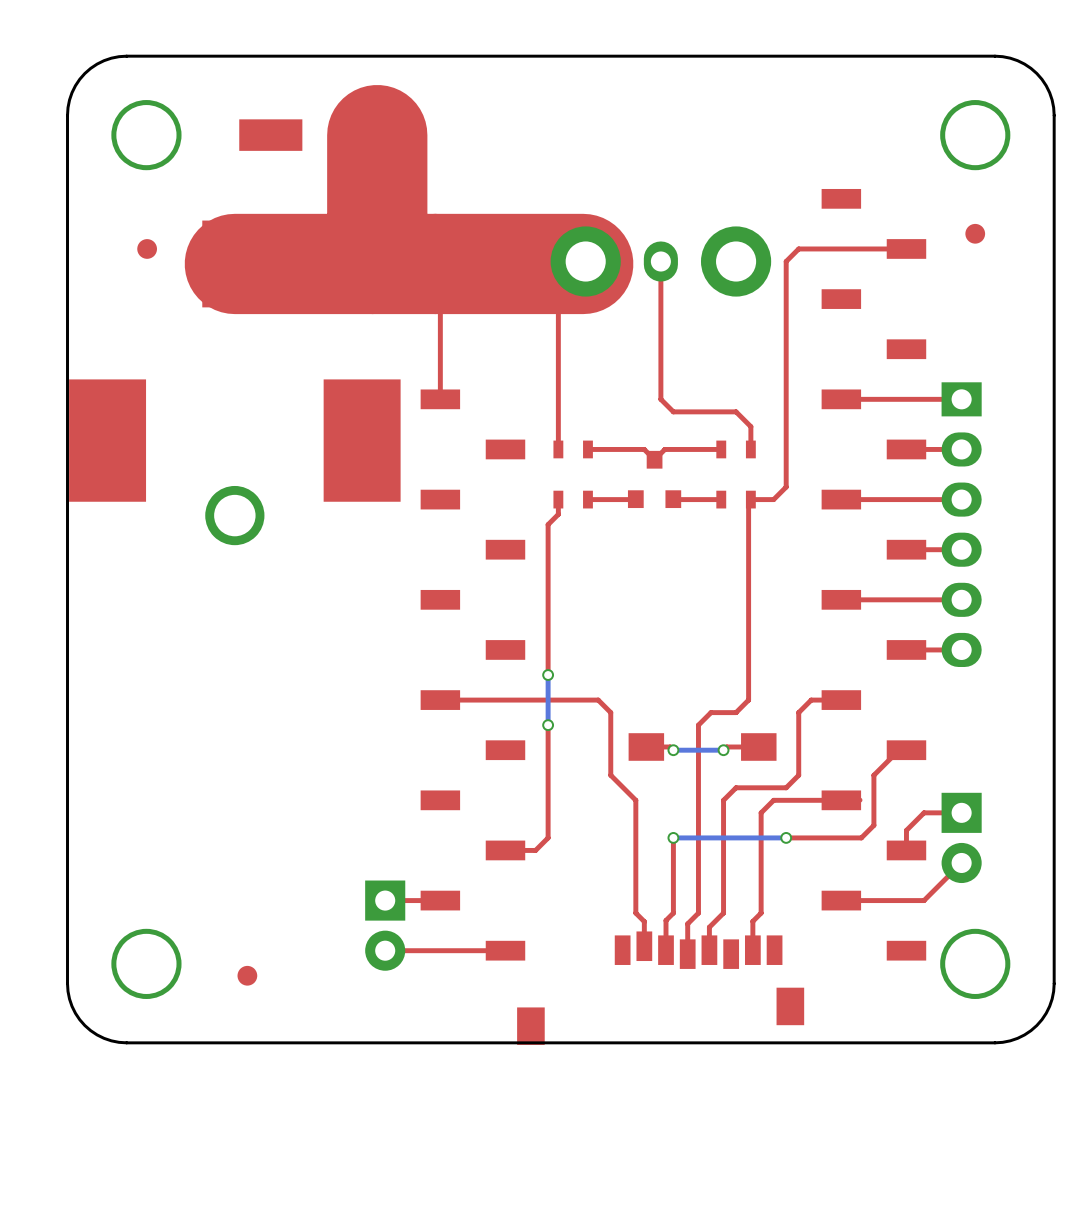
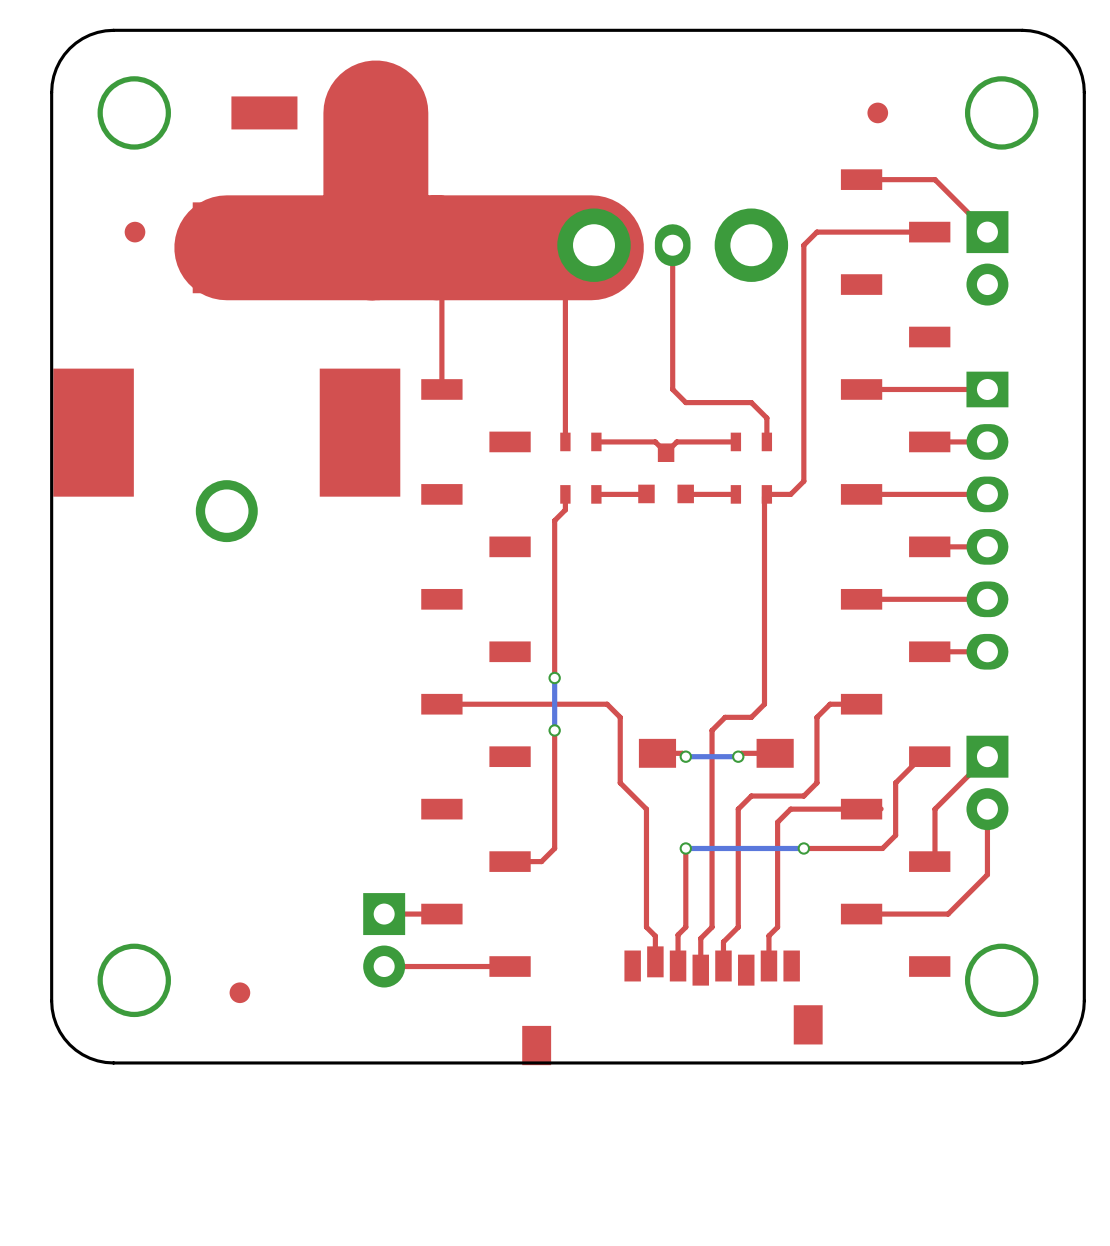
top track: none -> (861, 179) (934, 179) (987, 232)
part position: (975, 233) -> (877, 112)
part: none -> (987, 258)
top track: none -> (987, 809) (987, 874)
top track: (961, 812) (924, 812) (906, 830) (906, 850) -> (987, 756) (934, 809) (934, 856) (929, 861)
part position: (961, 837) -> (987, 782)

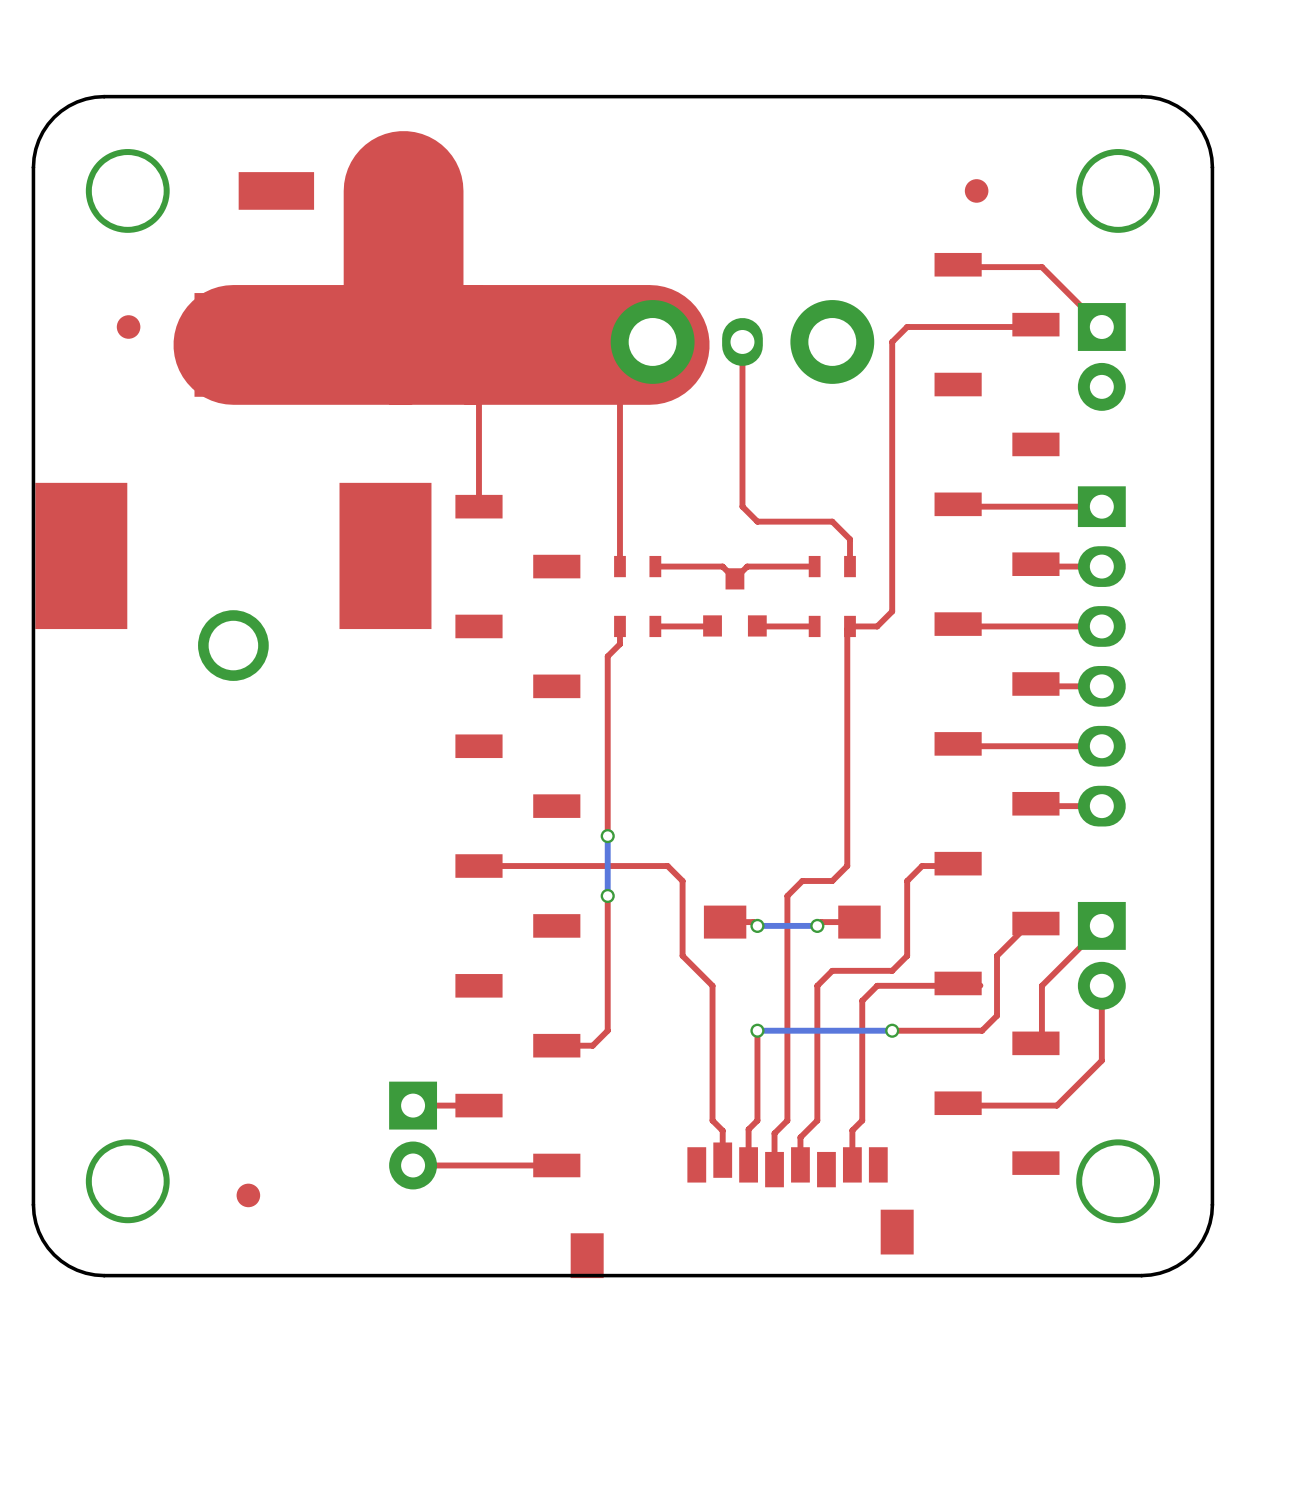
part: none -> (997, 474)
part: (895, 573) -> none
part: none -> (997, 953)

